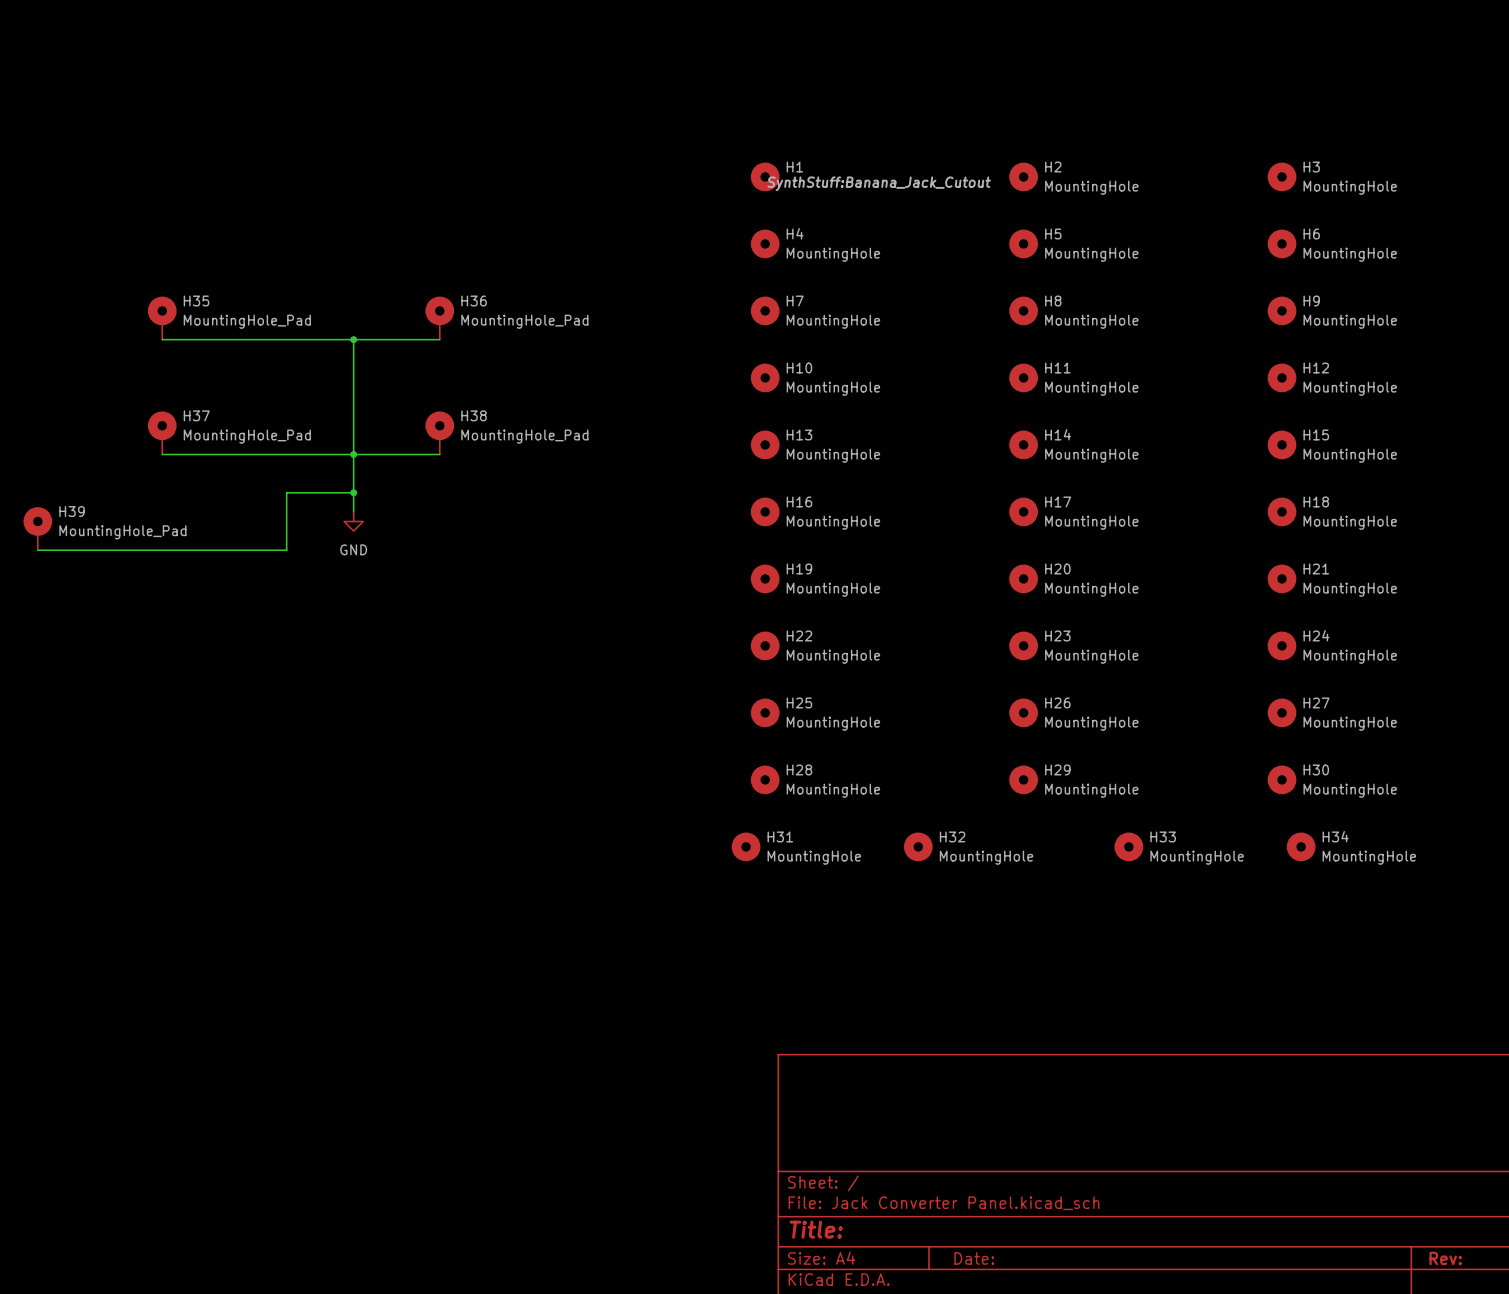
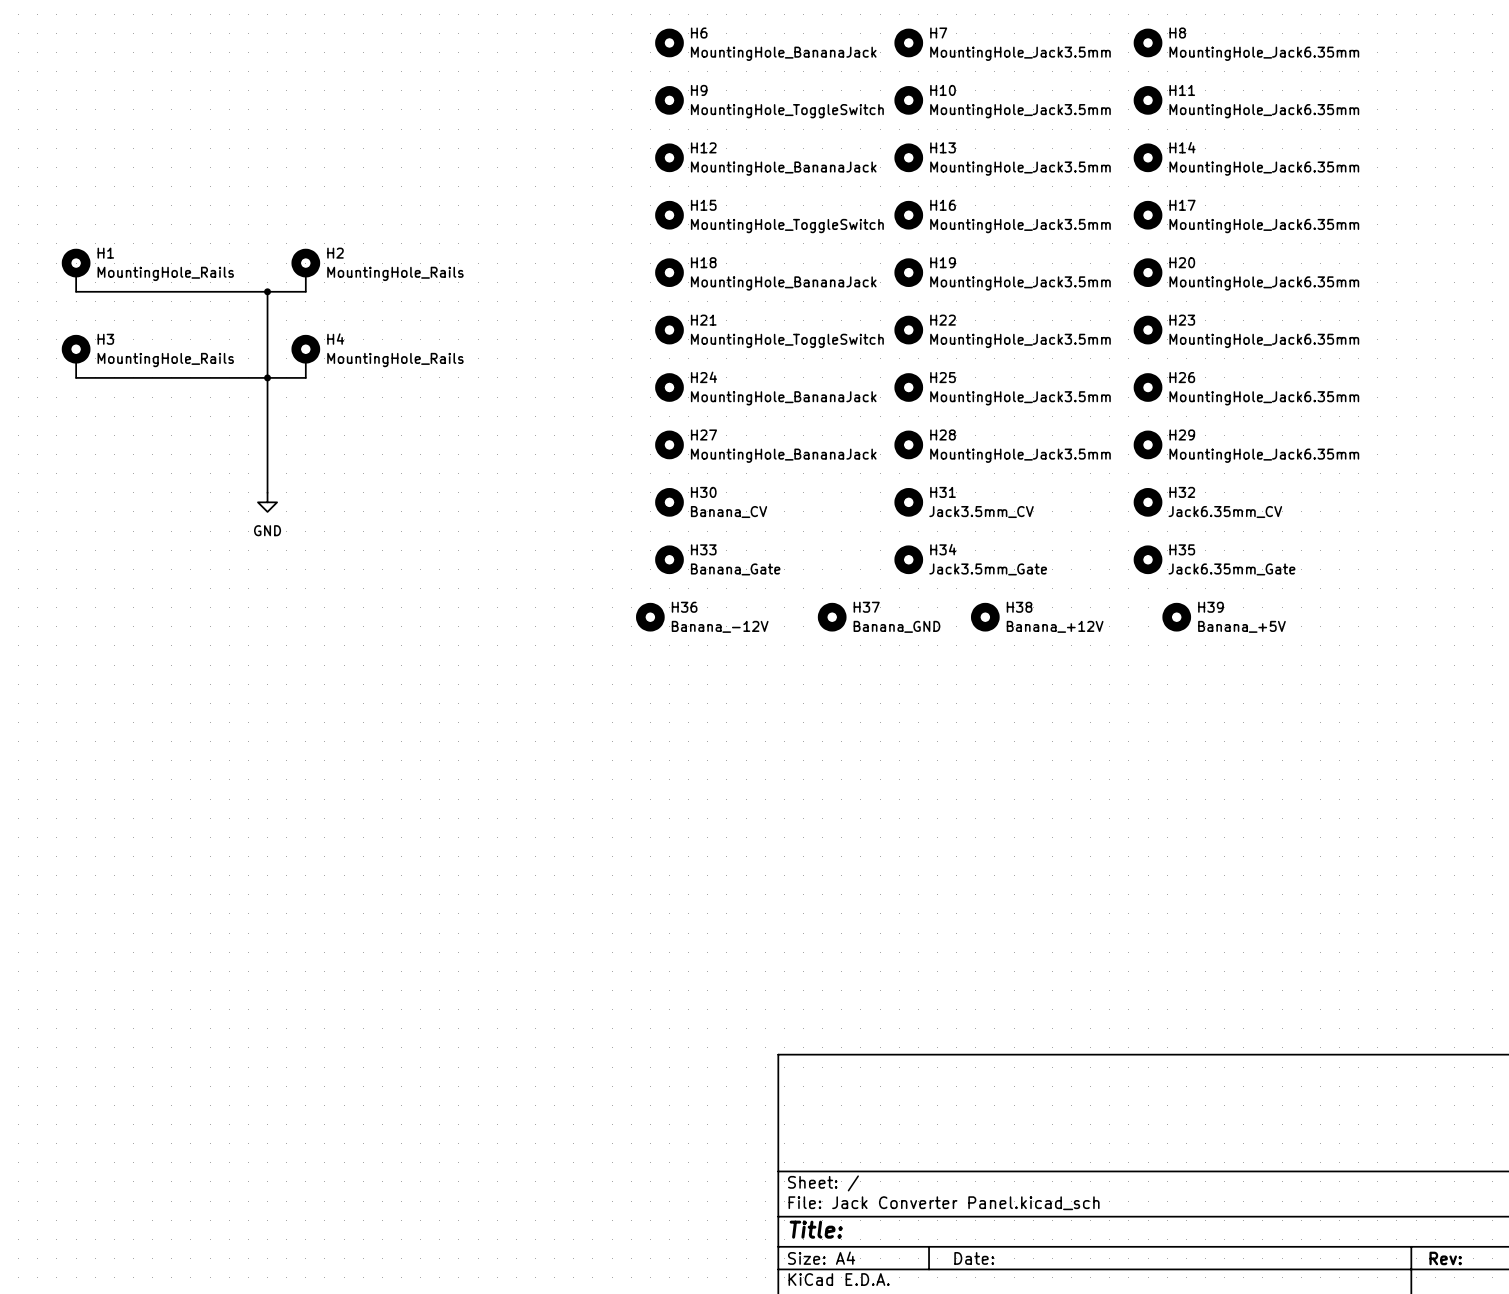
H1 symbol: [750, 162, 780, 192] -> [61, 248, 91, 292]
H2 symbol: [1009, 162, 1038, 192] -> [291, 248, 321, 292]
H3 symbol: [1267, 162, 1297, 192] -> [61, 334, 91, 378]
H1 text: SynthStuff:Banana_Jack_Cutout (879, 183) -> none
H2 value: MountingHole (1091, 187) -> MountingHole_Rails (395, 273)
H3 value: MountingHole (1350, 187) -> MountingHole_Rails (165, 360)
H4 symbol: [750, 229, 780, 259] -> [291, 334, 321, 378]
H5: MountingHole (1023, 243) -> none
H6 position: (1282, 243) -> (669, 42)
H4 value: MountingHole (833, 254) -> MountingHole_Rails (395, 360)
H6 value: MountingHole (1350, 254) -> MountingHole_BananaJack (783, 53)
H1 value: none -> MountingHole_Rails (165, 273)
wire: none -> (76, 291) (305, 291)
wire: none -> (267, 291) (267, 492)
junction: none -> (267, 291)
H35 symbol: [147, 296, 177, 340] -> [1133, 545, 1163, 575]
H36 symbol: [425, 296, 455, 340] -> [636, 602, 665, 632]
H7 position: (765, 310) -> (908, 42)
H8 position: (1023, 310) -> (1148, 42)
H9 position: (1282, 310) -> (669, 100)
H35 value: MountingHole_Pad (247, 321) -> Jack6.35mm_Gate (1231, 569)
H36 value: MountingHole_Pad (524, 321) -> Banana_-12V (720, 626)
H7 value: MountingHole (833, 321) -> MountingHole_Jack3.5mm (1020, 53)
H8 value: MountingHole (1091, 321) -> MountingHole_Jack6.35mm (1264, 53)
H9 value: MountingHole (1350, 321) -> MountingHole_ToggleSwitch (787, 111)
wire: (162, 339) (439, 339) -> none
wire: (353, 339) (353, 511) -> none
junction: (353, 339) -> none
wire: none -> (76, 377) (305, 377)
junction: none -> (267, 377)
H10 position: (765, 377) -> (908, 100)
H11 position: (1023, 377) -> (1148, 100)
H12 position: (1282, 377) -> (669, 157)
H10 value: MountingHole (833, 388) -> MountingHole_Jack3.5mm (1020, 111)
H11 value: MountingHole (1091, 388) -> MountingHole_Jack6.35mm (1264, 111)
H12 value: MountingHole (1350, 388) -> MountingHole_BananaJack (783, 168)
H37 symbol: [147, 411, 177, 455] -> [817, 602, 847, 632]
H38 symbol: [425, 411, 455, 455] -> [970, 602, 1000, 632]
H37 value: MountingHole_Pad (247, 436) -> Banana_GND (896, 626)
H38 value: MountingHole_Pad (524, 436) -> Banana_+12V (1055, 626)
H13 position: (765, 444) -> (908, 157)
H14 position: (1023, 444) -> (1148, 157)
H15 position: (1282, 444) -> (669, 215)
wire: (162, 454) (439, 454) -> none
junction: (353, 454) -> none
H13 value: MountingHole (833, 455) -> MountingHole_Jack3.5mm (1020, 168)
H14 value: MountingHole (1091, 455) -> MountingHole_Jack6.35mm (1264, 168)
H15 value: MountingHole (1350, 455) -> MountingHole_ToggleSwitch (787, 226)
wire: (353, 492) (286, 492) (286, 550) (37, 550) -> none
junction: (353, 492) -> none
H39 symbol: [23, 507, 53, 551] -> [1162, 602, 1192, 632]
H16 position: (765, 511) -> (908, 215)
H17 position: (1023, 511) -> (1148, 215)
H18 position: (1282, 511) -> (669, 272)
power symbol position: GND (353, 521) -> GND (267, 502)
H16 value: MountingHole (833, 522) -> MountingHole_Jack3.5mm (1020, 226)
H17 value: MountingHole (1091, 522) -> MountingHole_Jack6.35mm (1264, 226)
H18 value: MountingHole (1350, 522) -> MountingHole_BananaJack (783, 283)
H39 value: MountingHole_Pad (122, 532) -> Banana_+5V (1241, 626)
H19 position: (765, 578) -> (908, 272)
H20 position: (1023, 578) -> (1148, 272)
H21 position: (1282, 578) -> (669, 330)
H19 value: MountingHole (833, 589) -> MountingHole_Jack3.5mm (1020, 283)
H20 value: MountingHole (1091, 589) -> MountingHole_Jack6.35mm (1264, 283)
H21 value: MountingHole (1350, 589) -> MountingHole_ToggleSwitch (787, 340)
H22 position: (765, 645) -> (908, 330)
H23 position: (1023, 645) -> (1148, 330)
H24 position: (1282, 645) -> (669, 387)
H22 value: MountingHole (833, 656) -> MountingHole_Jack3.5mm (1020, 340)
H23 value: MountingHole (1091, 656) -> MountingHole_Jack6.35mm (1264, 340)
H24 value: MountingHole (1350, 656) -> MountingHole_BananaJack (783, 398)
H25 position: (765, 712) -> (908, 387)
H26 position: (1023, 712) -> (1148, 387)
H27 position: (1282, 712) -> (669, 444)
H25 value: MountingHole (833, 723) -> MountingHole_Jack3.5mm (1020, 398)
H26 value: MountingHole (1091, 723) -> MountingHole_Jack6.35mm (1264, 398)
H27 value: MountingHole (1350, 723) -> MountingHole_BananaJack (783, 455)
H28 position: (765, 779) -> (908, 444)
H29 position: (1023, 779) -> (1148, 444)
H30 position: (1282, 779) -> (669, 502)
H28 value: MountingHole (833, 790) -> MountingHole_Jack3.5mm (1020, 455)
H29 value: MountingHole (1091, 790) -> MountingHole_Jack6.35mm (1264, 455)
H30 value: MountingHole (1350, 790) -> Banana_CV (729, 512)
H31 position: (746, 846) -> (908, 502)
H32 position: (918, 846) -> (1148, 502)
H33 position: (1128, 846) -> (669, 559)
H34 position: (1301, 846) -> (908, 559)
H31 value: MountingHole (814, 857) -> Jack3.5mm_CV (981, 512)
H32 value: MountingHole (986, 857) -> Jack6.35mm_CV (1225, 512)
H33 value: MountingHole (1197, 857) -> Banana_Gate (735, 569)
H34 value: MountingHole (1369, 857) -> Jack3.5mm_Gate (988, 569)

